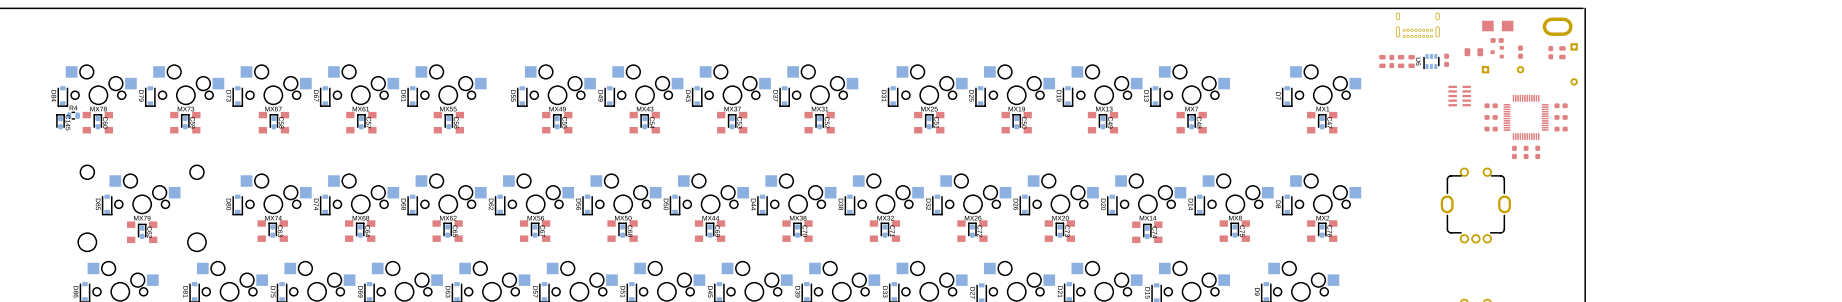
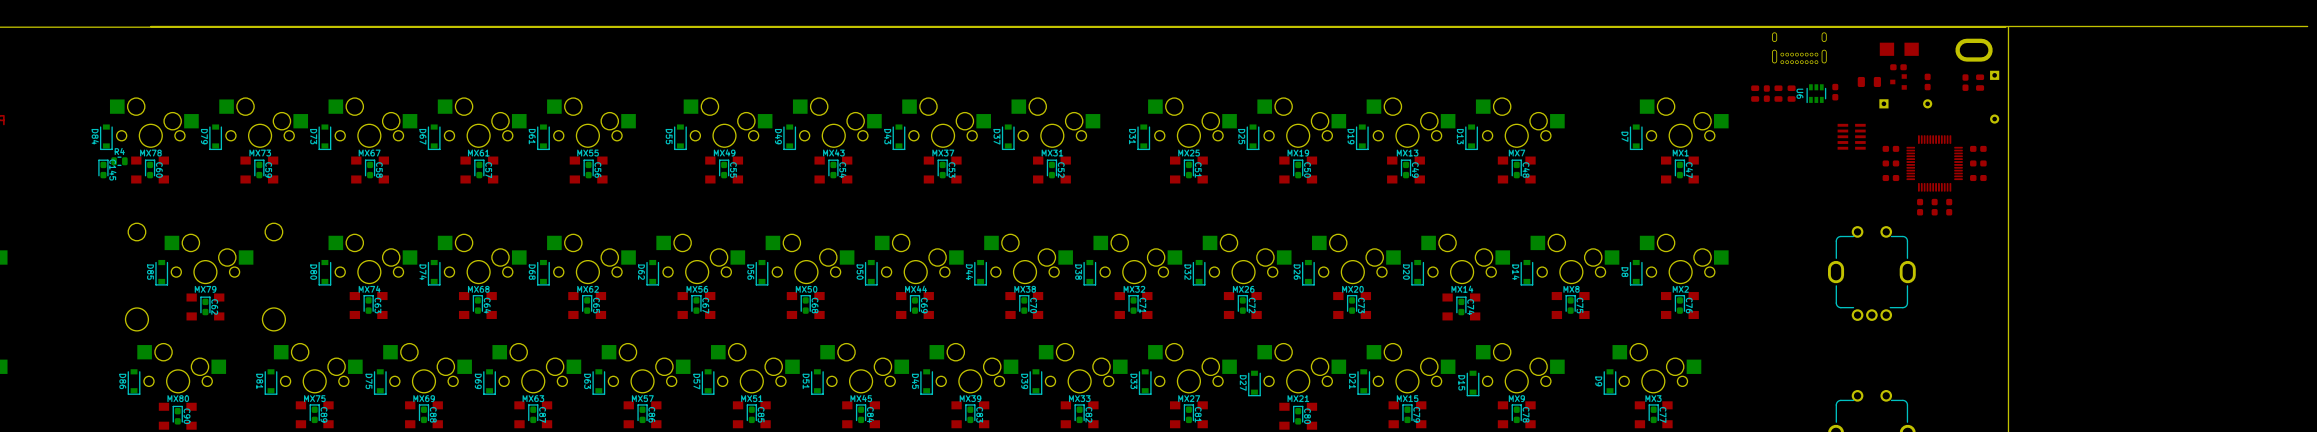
board edge: none -> (2307, 26) (150, 26)

